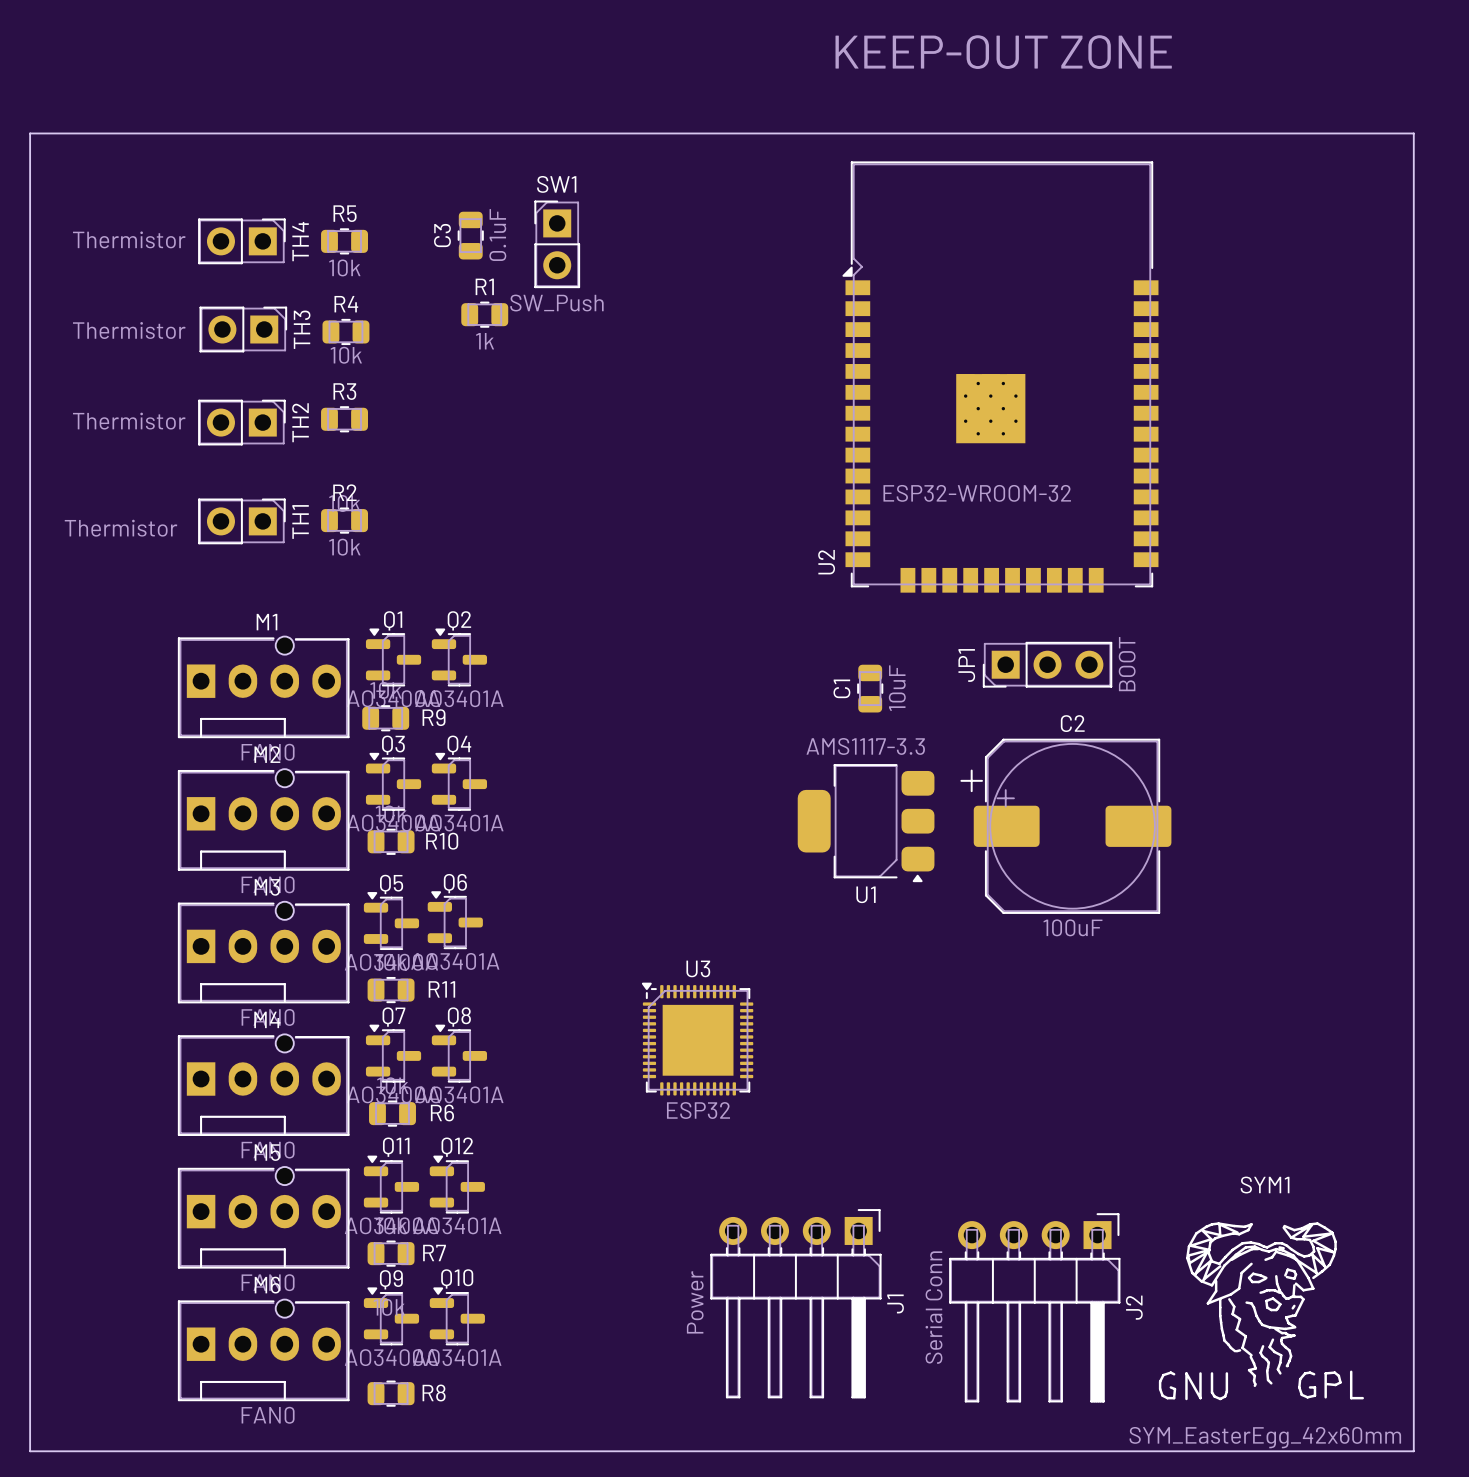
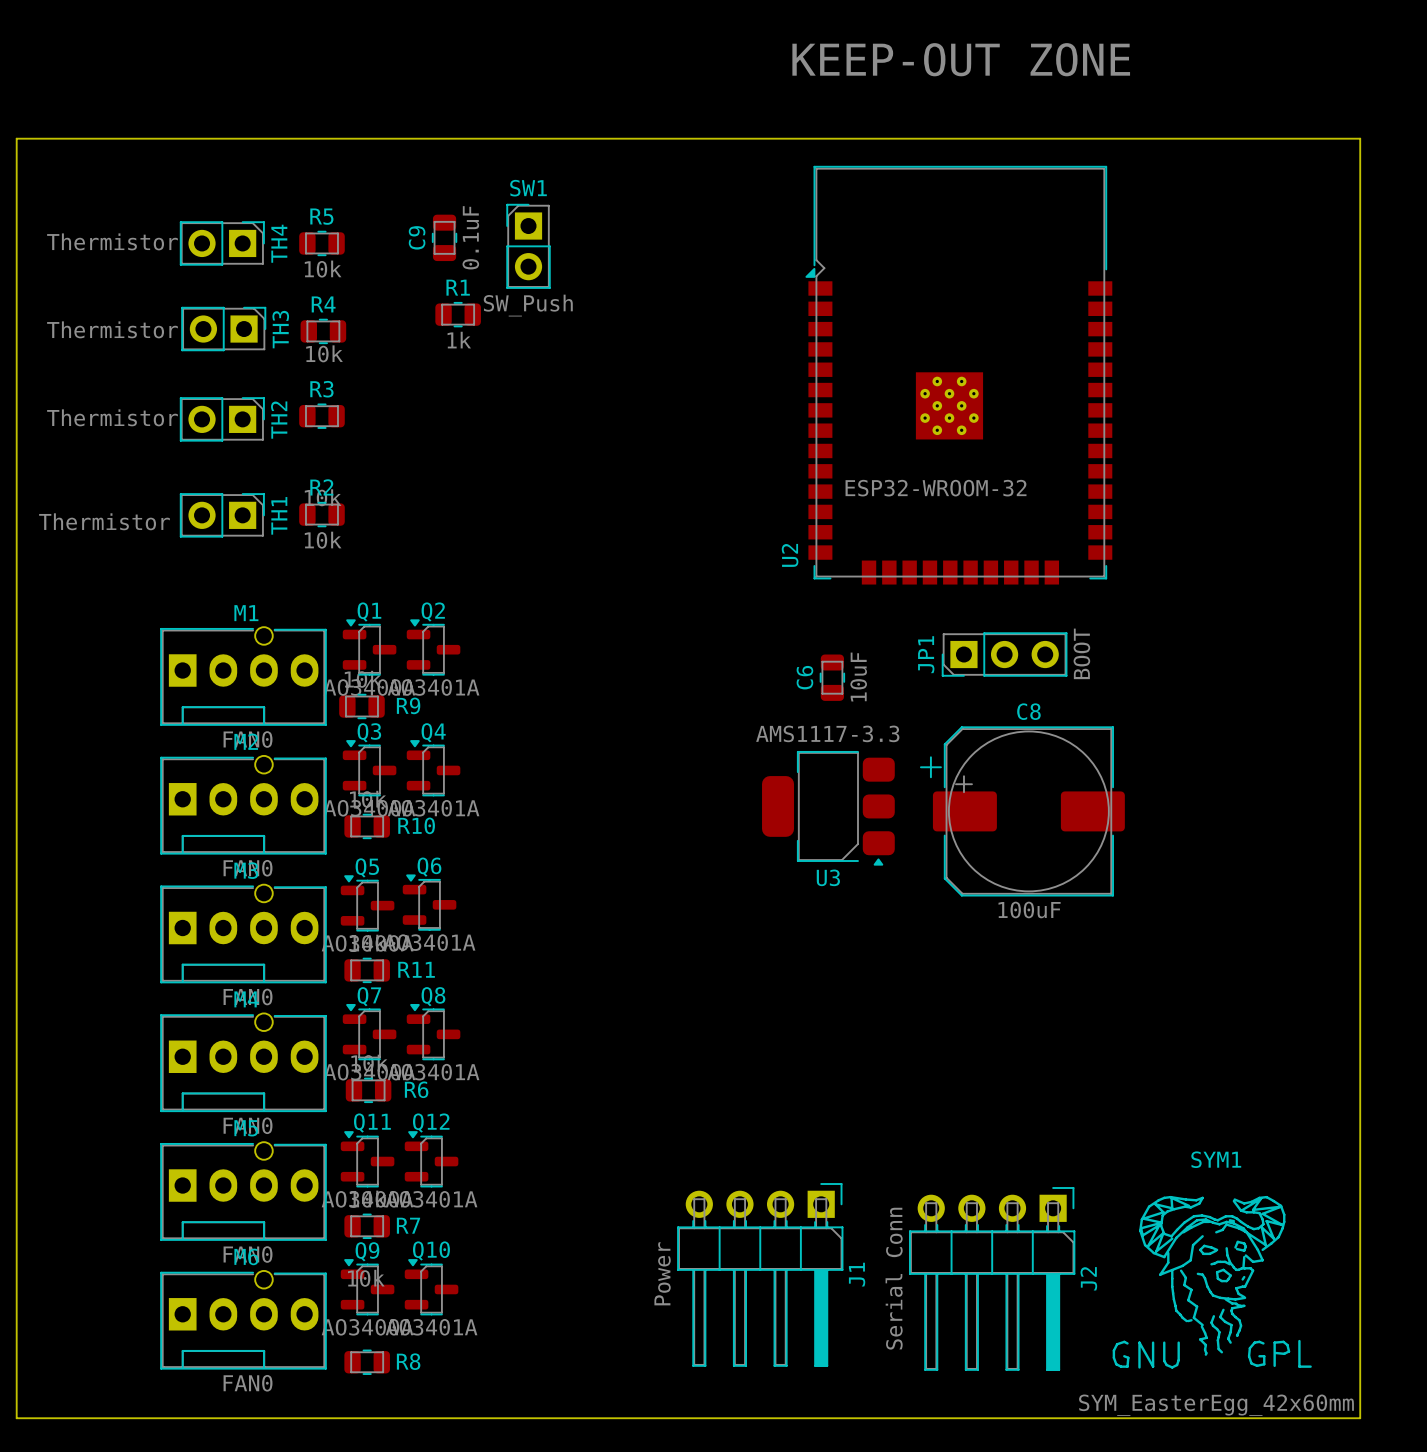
C3 name: C3 (442, 235) -> C9 (417, 237)
C1 name: C1 (841, 688) -> C6 (804, 677)
C2 name: C2 (1072, 723) -> C8 (1028, 711)
U1 name: U1 (866, 894) -> U3 (828, 877)
U3: ESP32 (697, 1039) -> none

